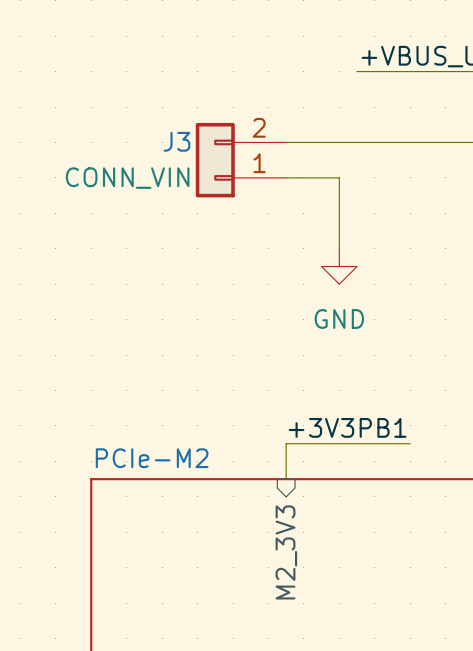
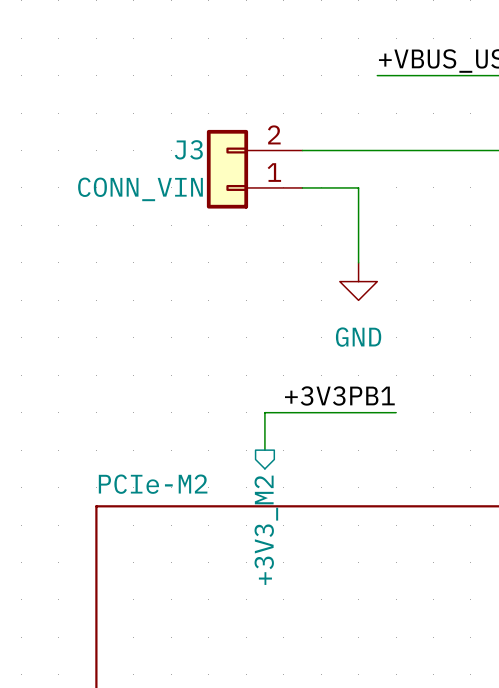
label position: +3V3PB1 (347, 427) -> +3V3PB1 (339, 395)
wire: (410, 443) (286, 443) (286, 479) -> (396, 412) (264, 412) (264, 450)
sheet pin: none -> +3V3_M2 (266, 530)
sheet pin: M2_3V3 (286, 552) -> none

